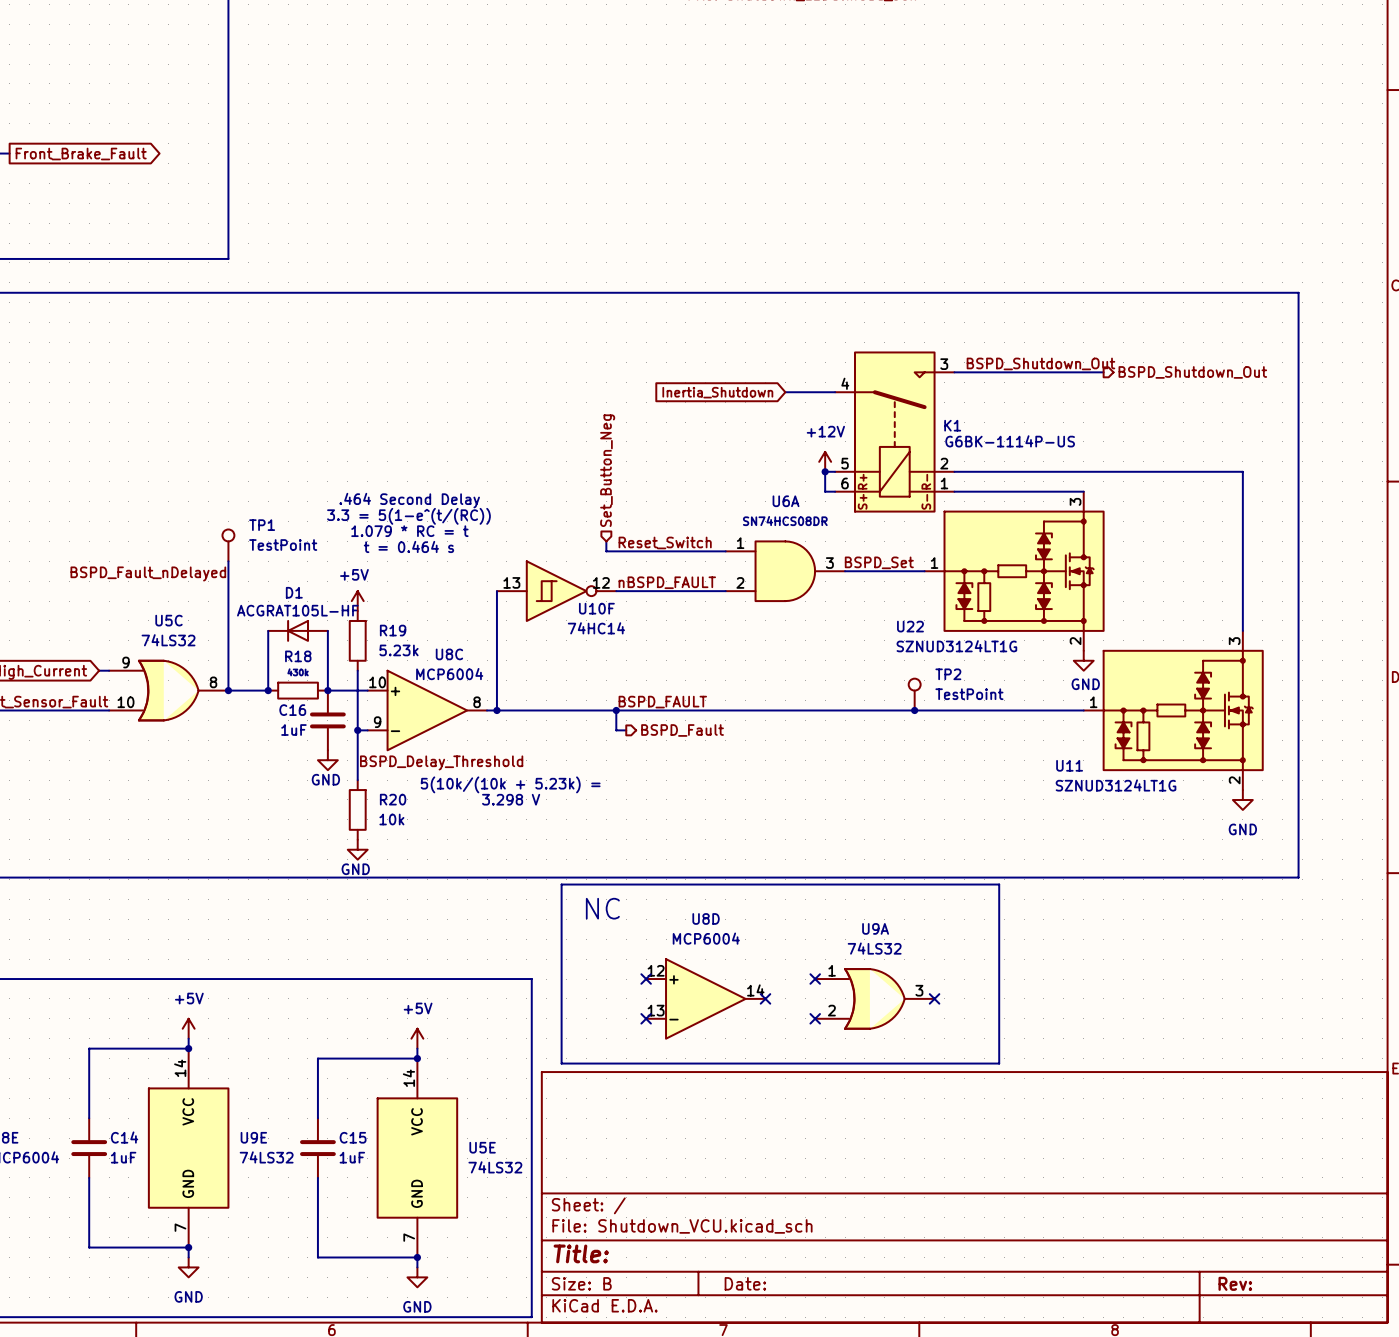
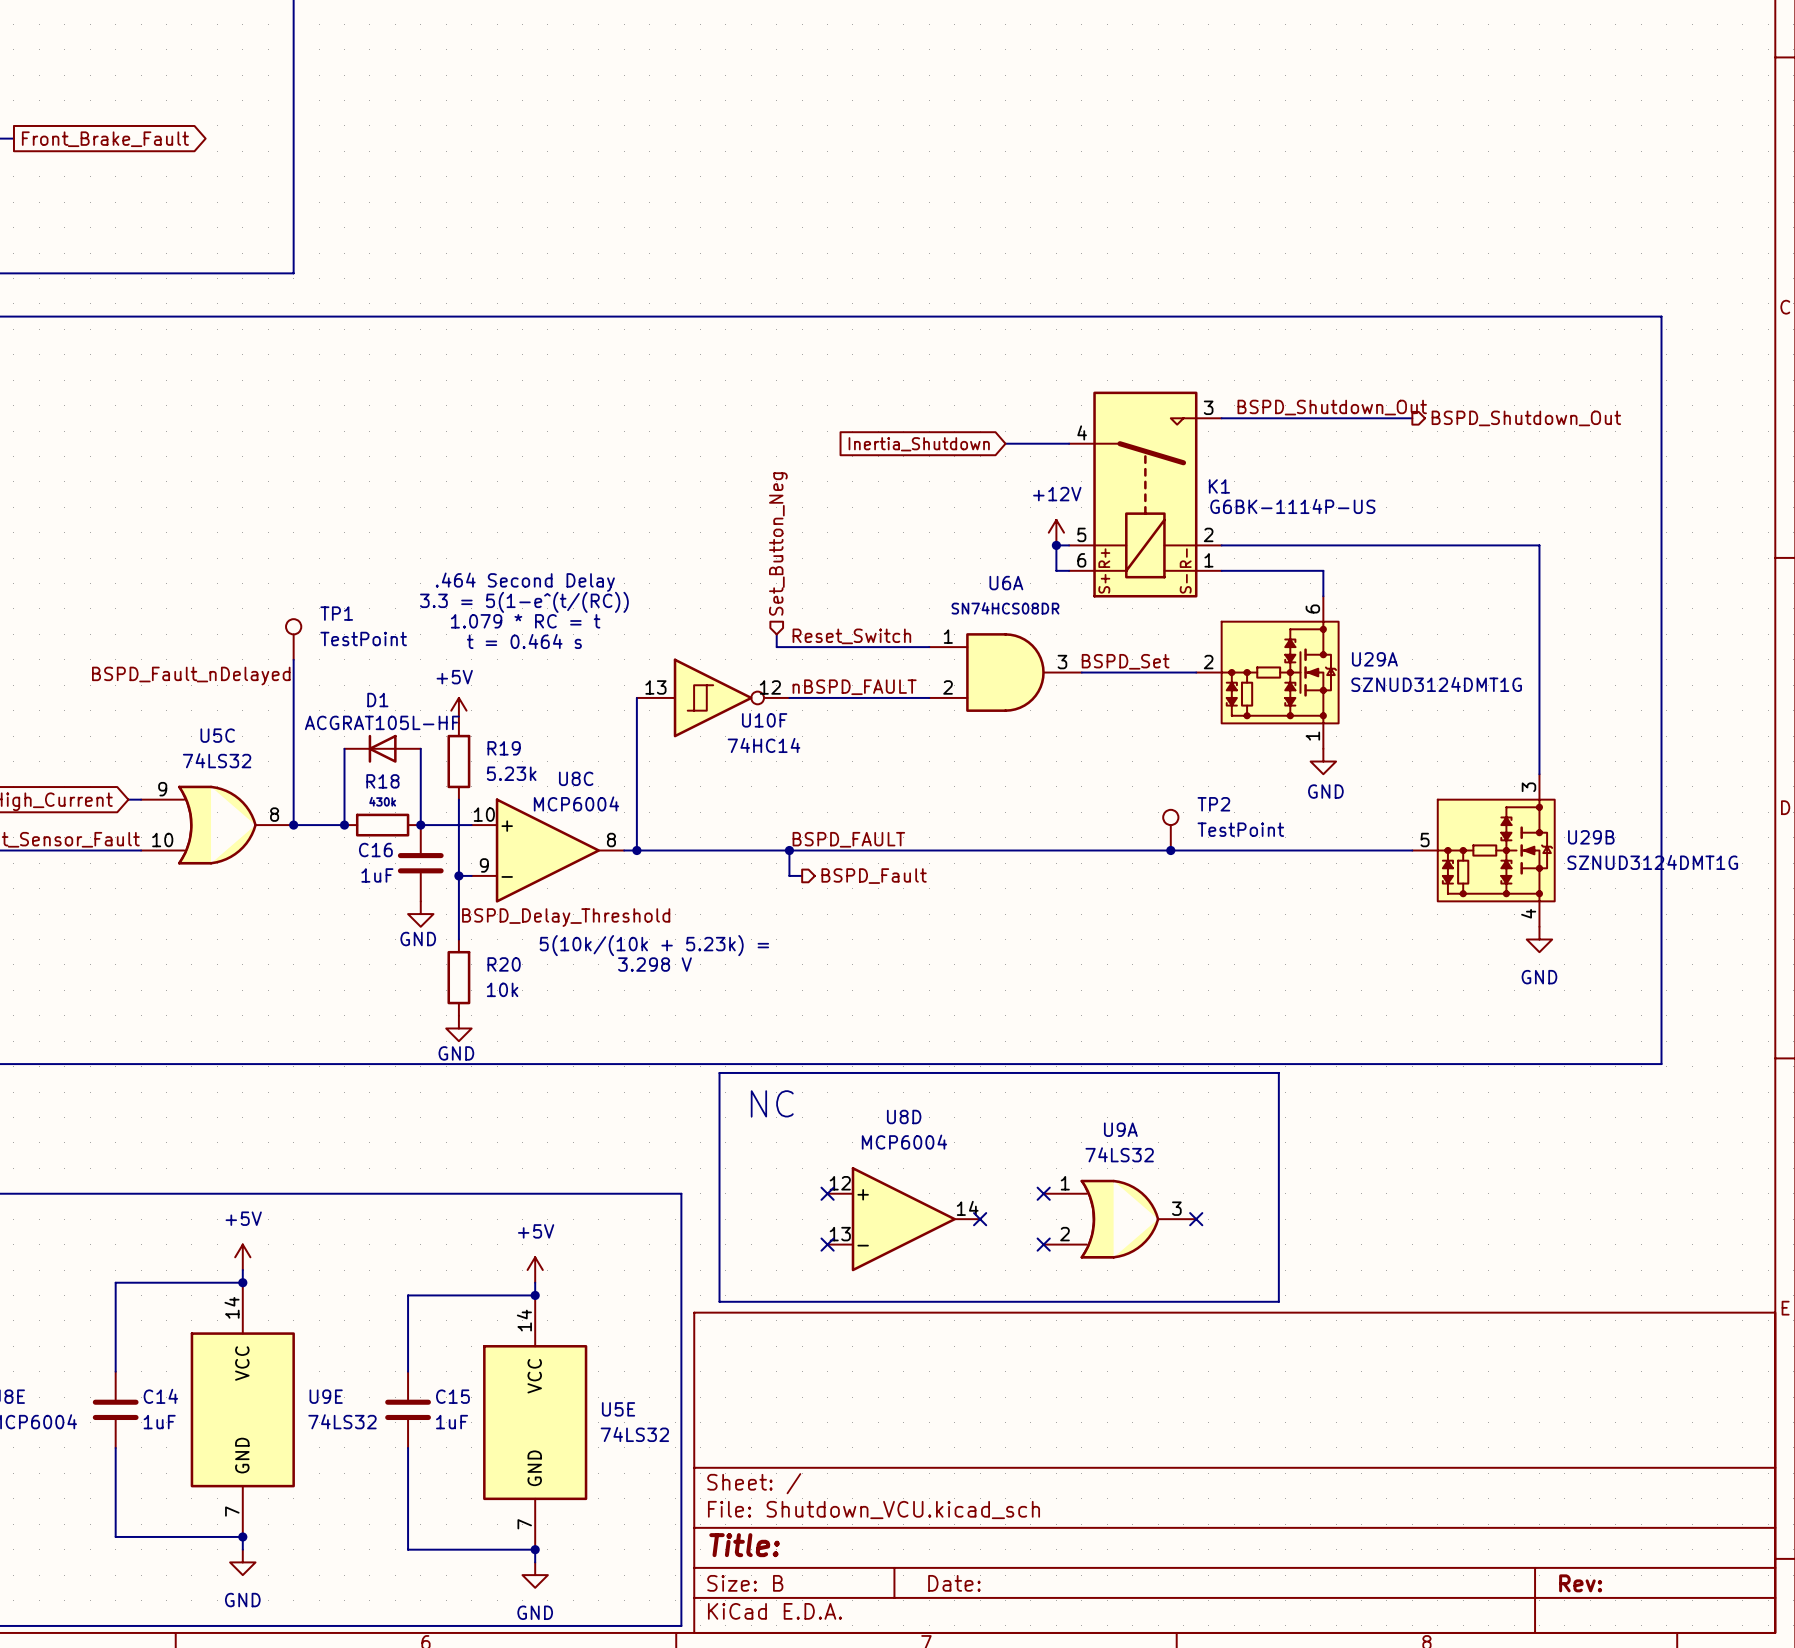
wire: (1203, 471) (1242, 471) (1242, 630) -> (1539, 545) (1539, 774)
wire: (1034, 491) (1083, 491) -> (1323, 570) (1323, 596)
U29A: none -> SZNUD3124DMT1G (1267, 672)
U22: SZNUD3124LT1G (1014, 571) -> none
power symbol position: GND (1083, 660) -> GND (1323, 761)
U29B: none -> SZNUD3124DMT1G (1483, 850)
U11: SZNUD3124LT1G (1173, 710) -> none
power symbol position: GND (1242, 799) -> GND (1539, 939)

